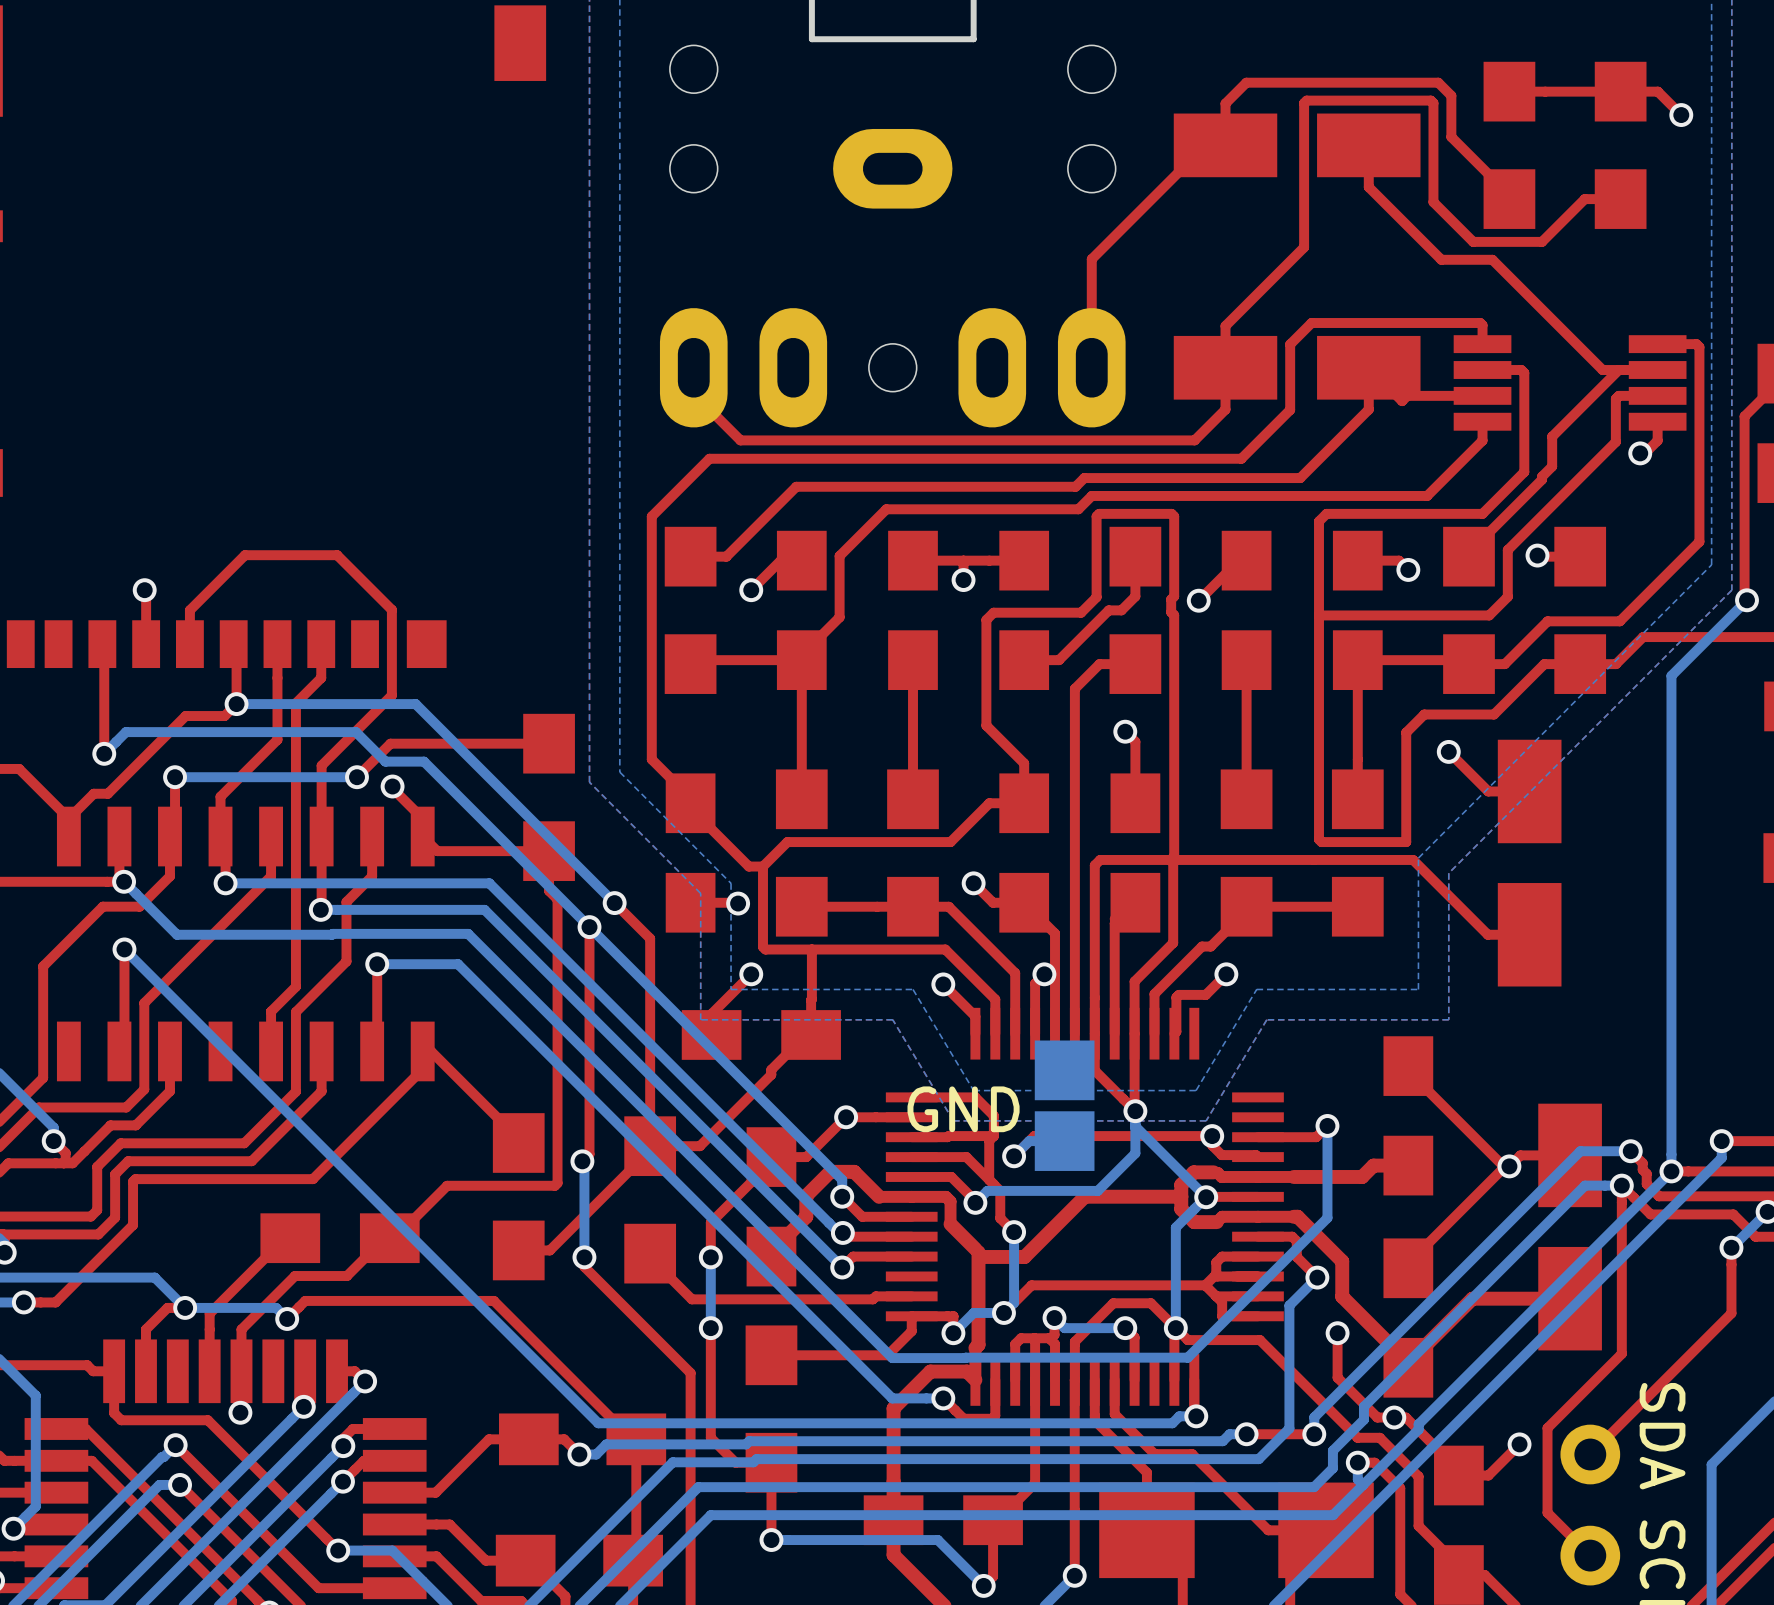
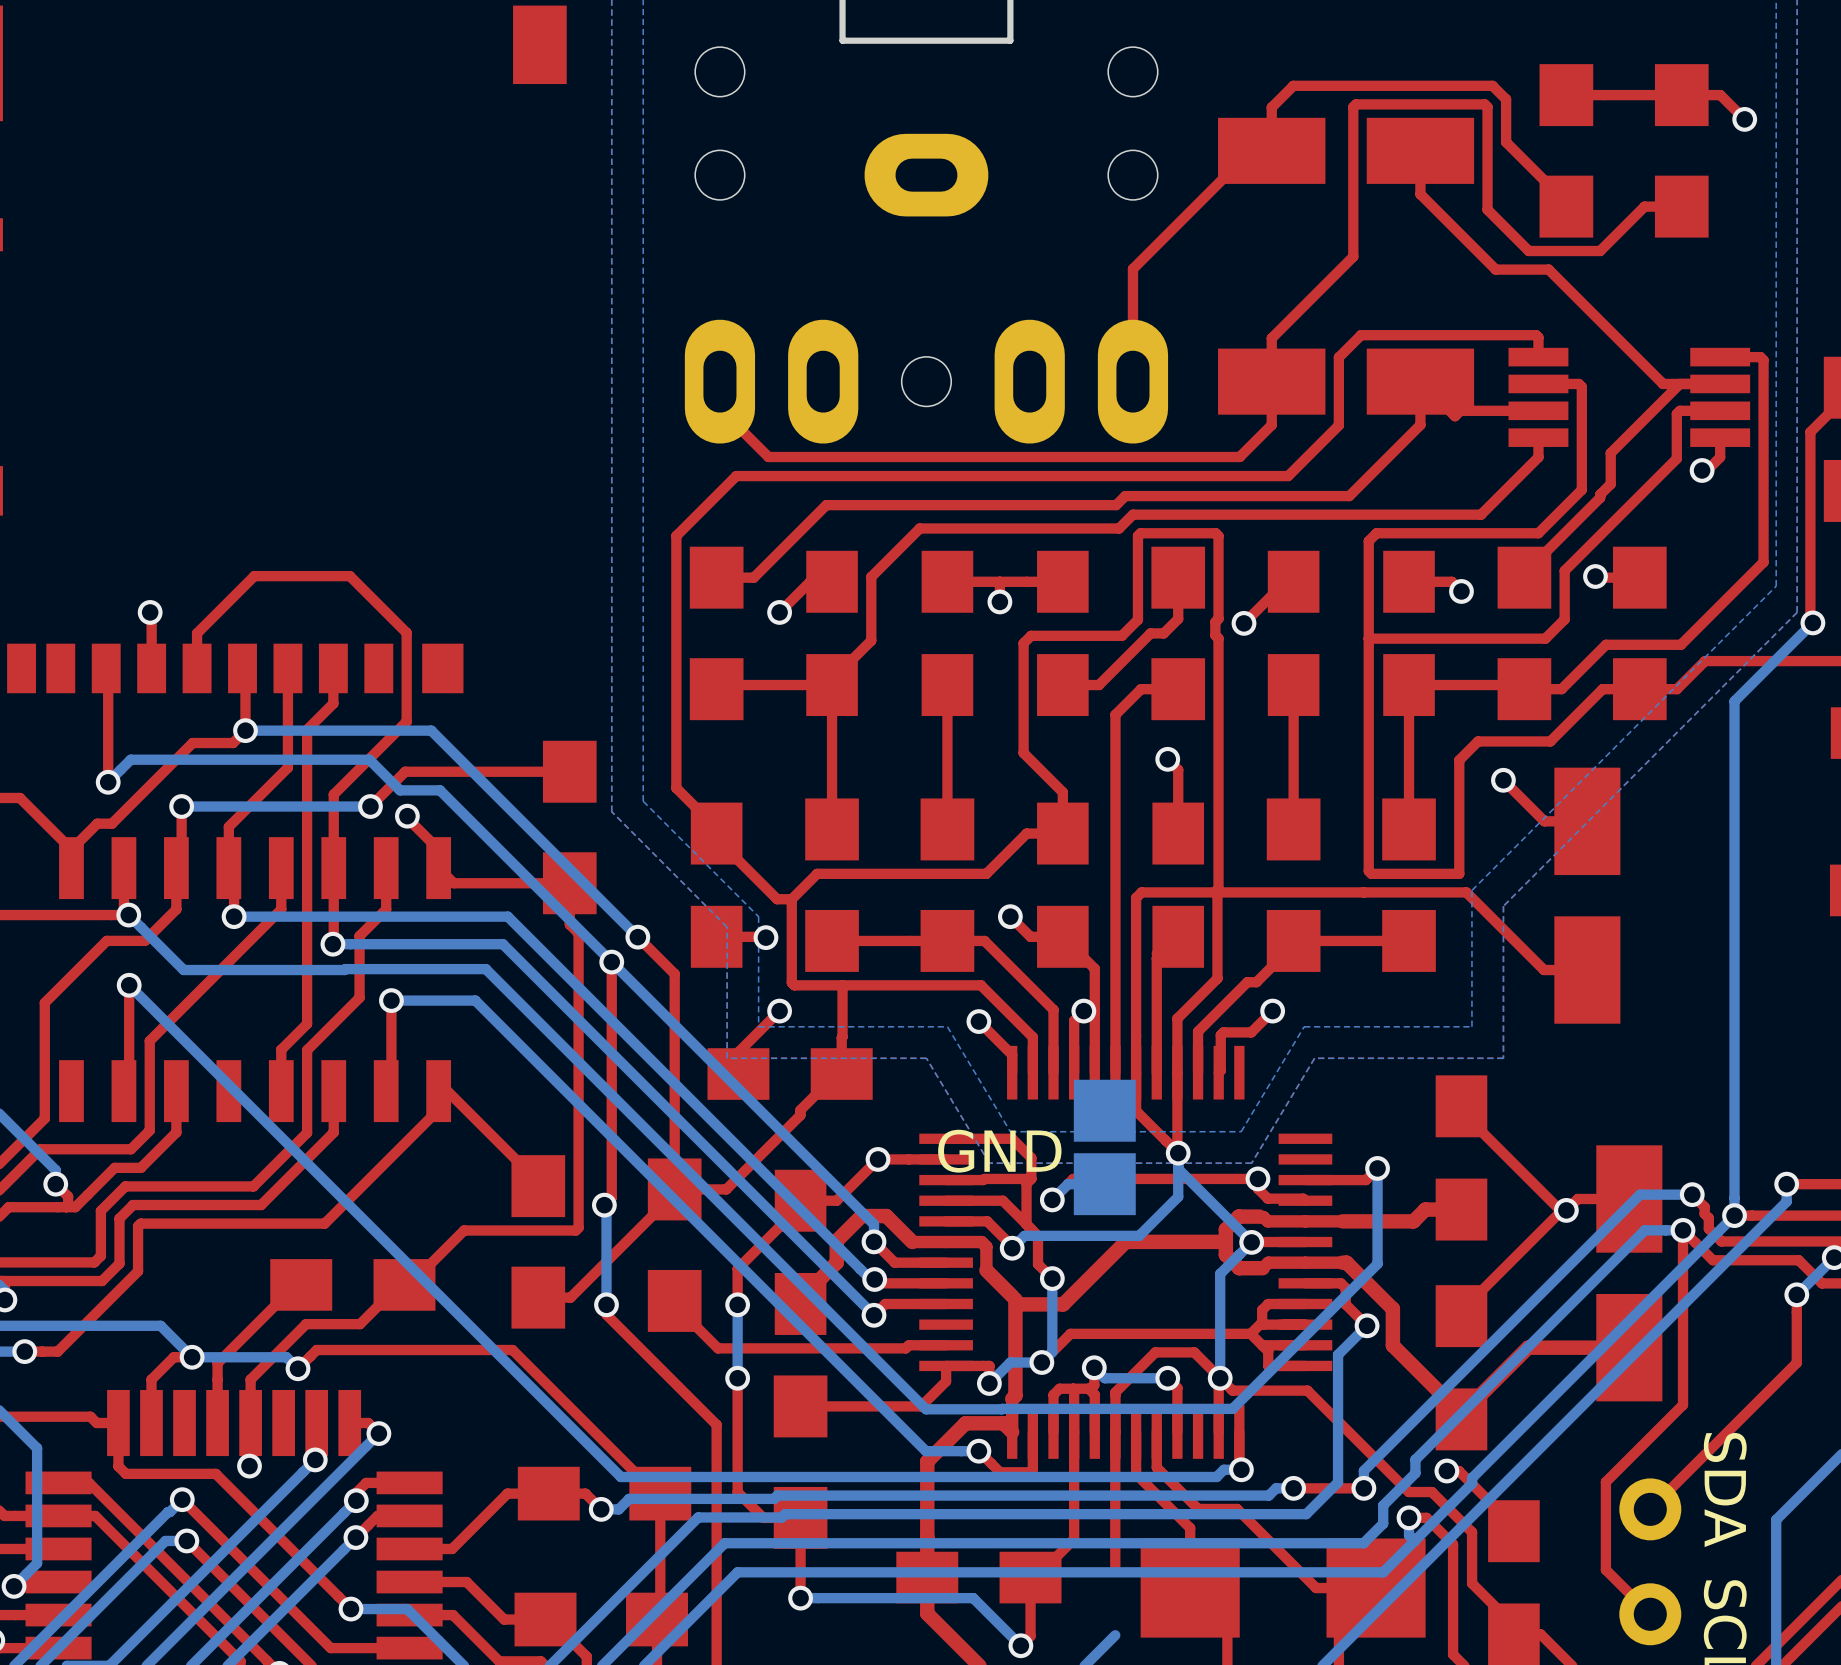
top track: (1337, 1333) (1337, 1377) (1377, 1417) (1394, 1417) -> none
via: (1337, 1333) -> none
top track: (1519, 1444) (1488, 1475) (1458, 1475) -> none
via: (1519, 1444) -> none
top track: (1074, 1510) (1074, 1575) -> none
via: (1074, 1575) -> none

